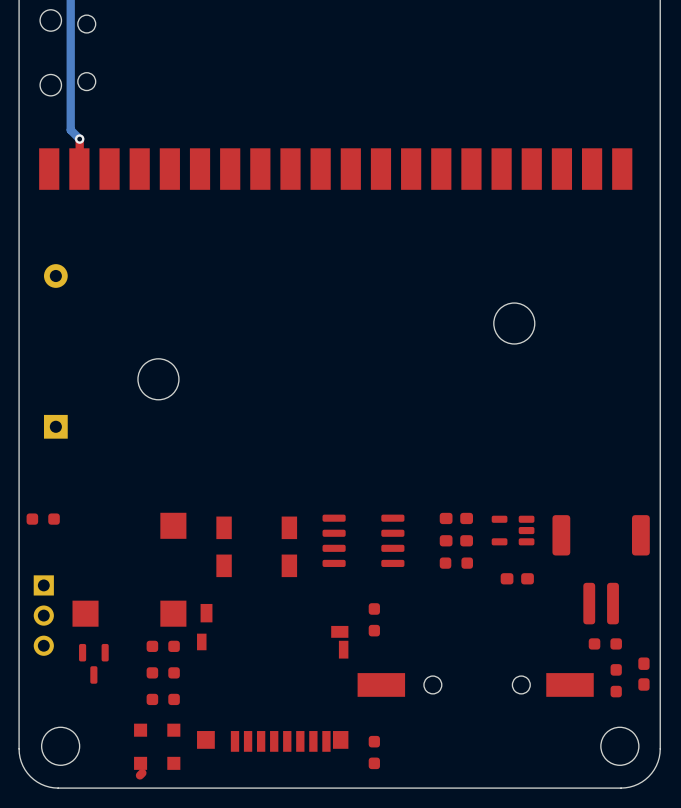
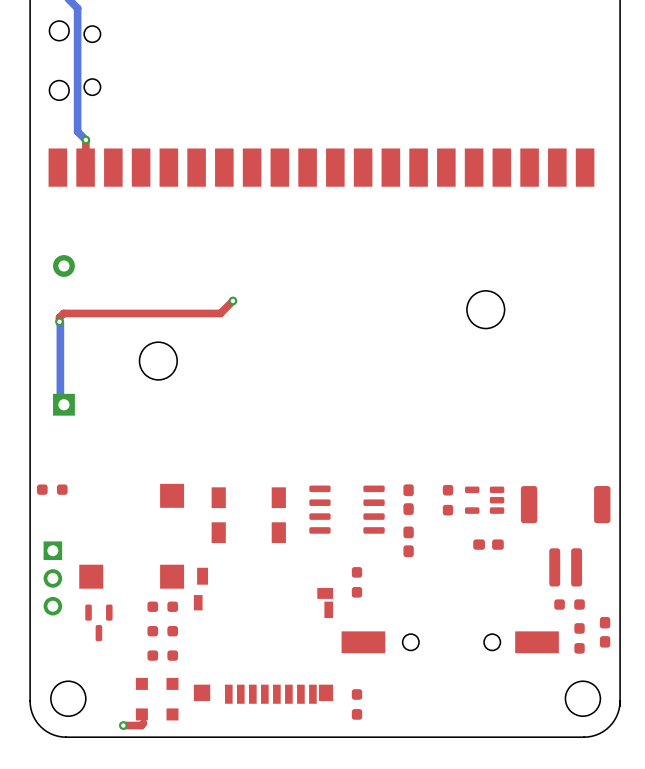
top track: none -> (232, 300) (220, 313) (63, 313) (59, 317) (59, 321)
via: none -> (232, 300)
bottom track: none -> (59, 321) (60, 404)
via: none -> (59, 321)
part: (456, 518) -> none
part: none -> (408, 499)
part: (456, 540) -> none
part rotation: 0° (456, 563) -> 90° clockwise (448, 500)
part position: (456, 563) -> (448, 500)
part: none -> (408, 541)
via: none -> (123, 725)
top track: none -> (141, 725) (123, 725)

